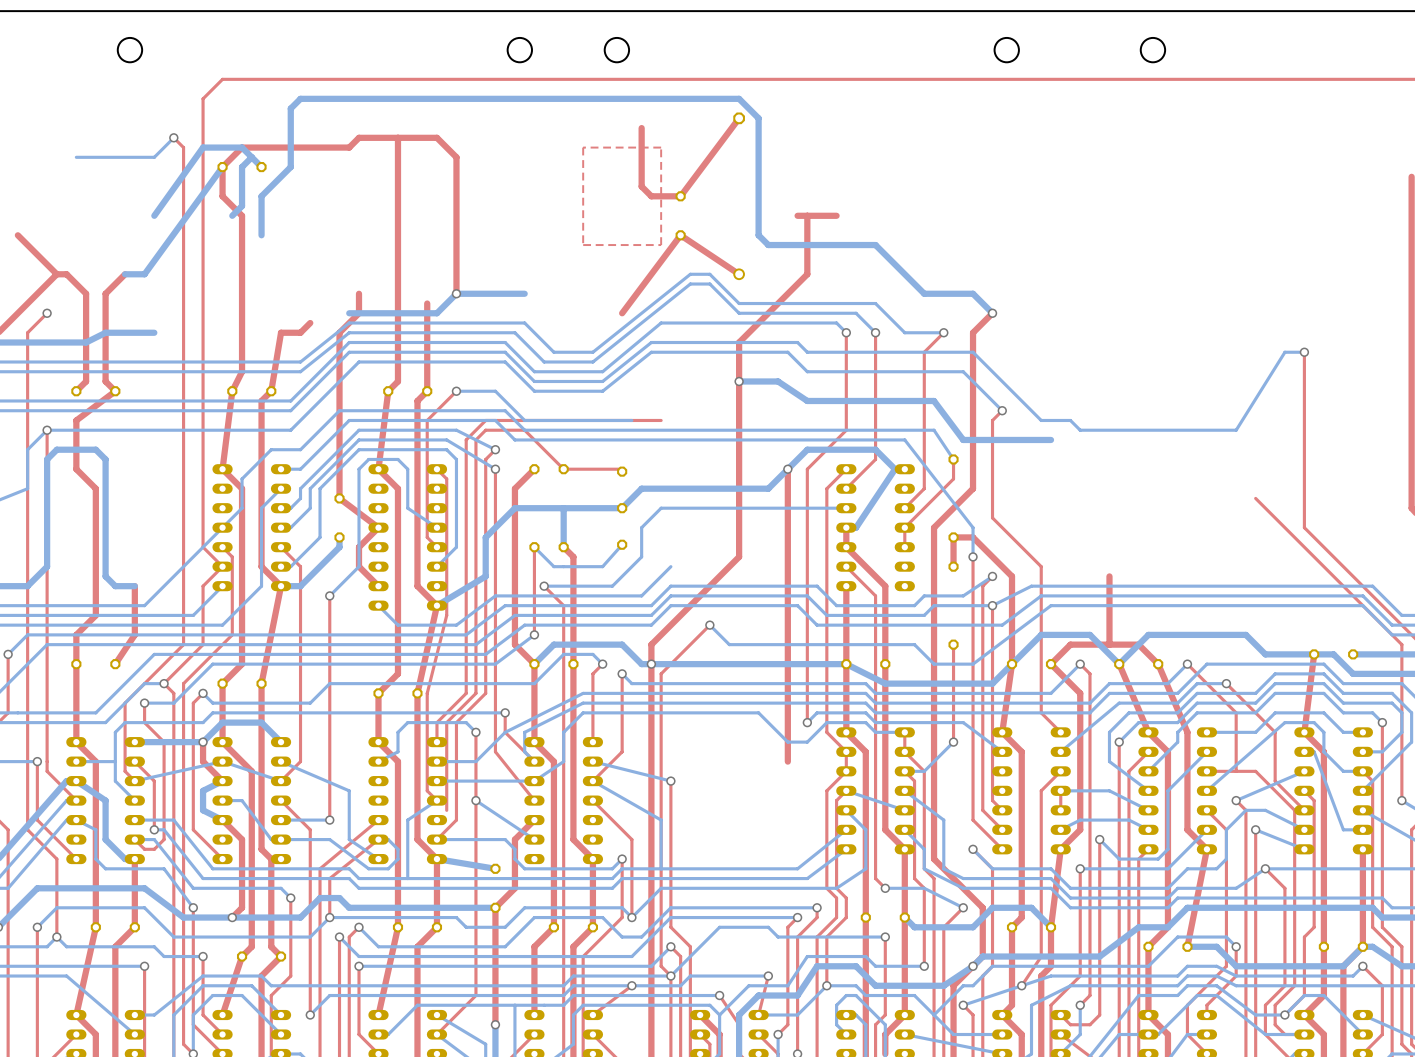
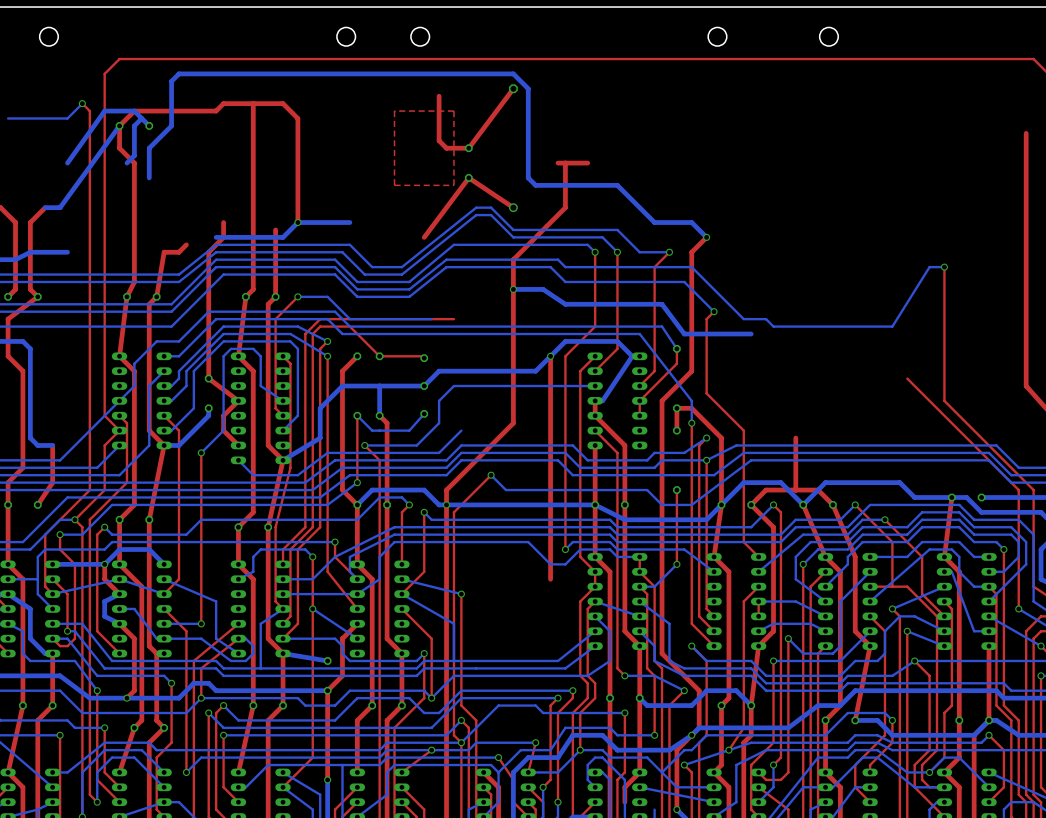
top track: none -> (290, 616) (283, 623)

